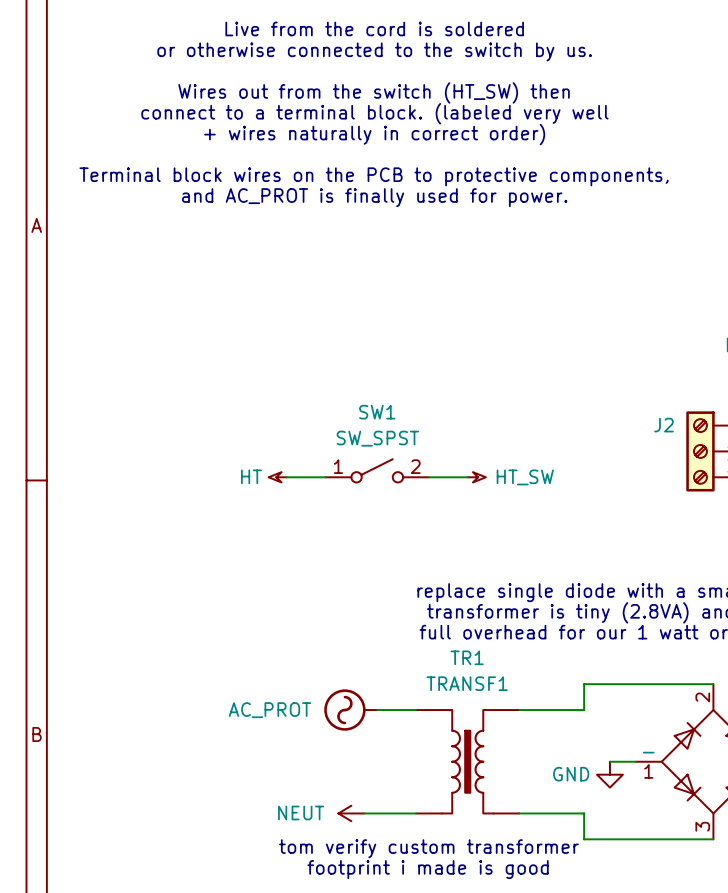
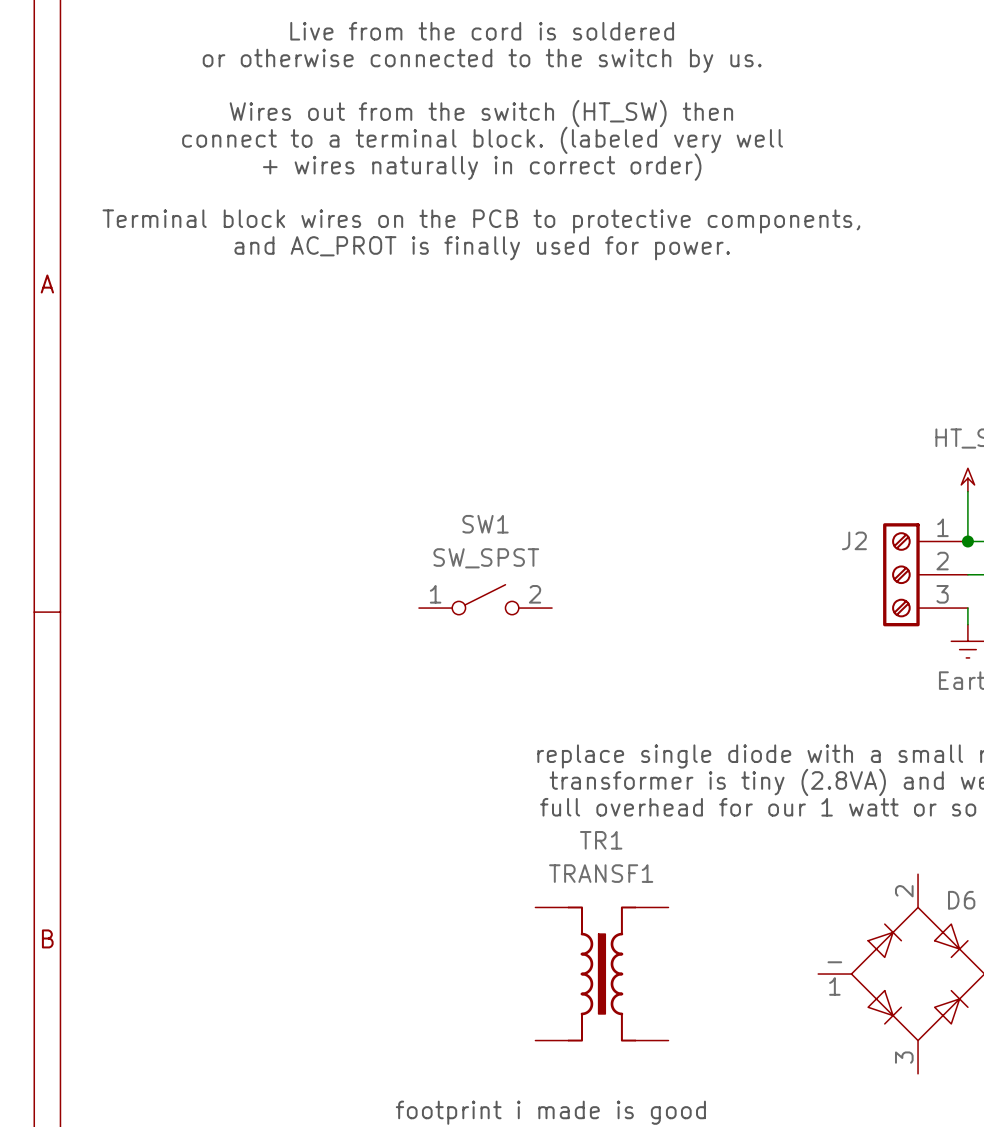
power symbol: HT (277, 477) -> none
wire: (286, 477) (325, 477) -> none
wire: (428, 477) (467, 477) -> none
power symbol: HT_SW (476, 477) -> none
wire: (713, 684) (584, 684) (584, 710) (519, 710) -> none
power symbol: AC_PROT (350, 710) -> none
wire: (377, 710) (416, 710) -> none
wire: (609, 761) (635, 761) -> none
power symbol: GND (609, 774) -> none
power symbol: NEUT (351, 813) -> none
wire: (364, 813) (416, 813) -> none
wire: (519, 813) (584, 813) (584, 839) (713, 839) -> none
text: tom verify custom transformer (428, 848) -> none

